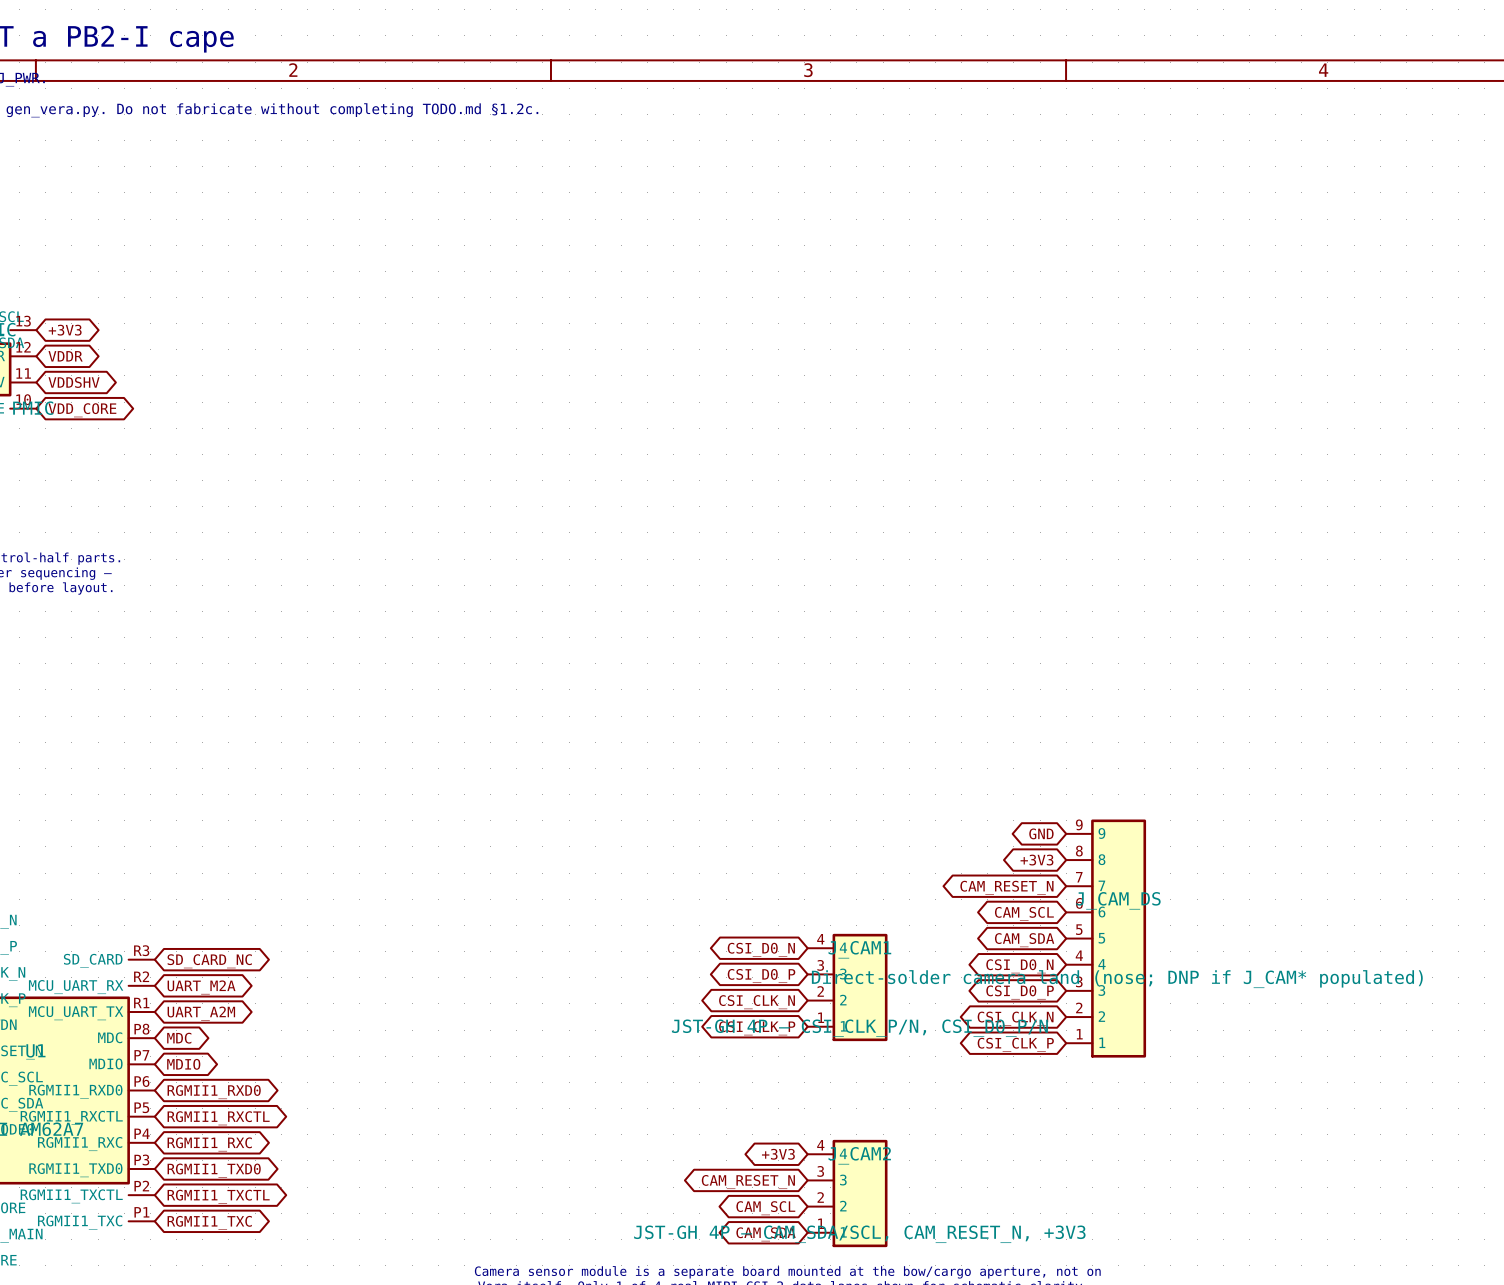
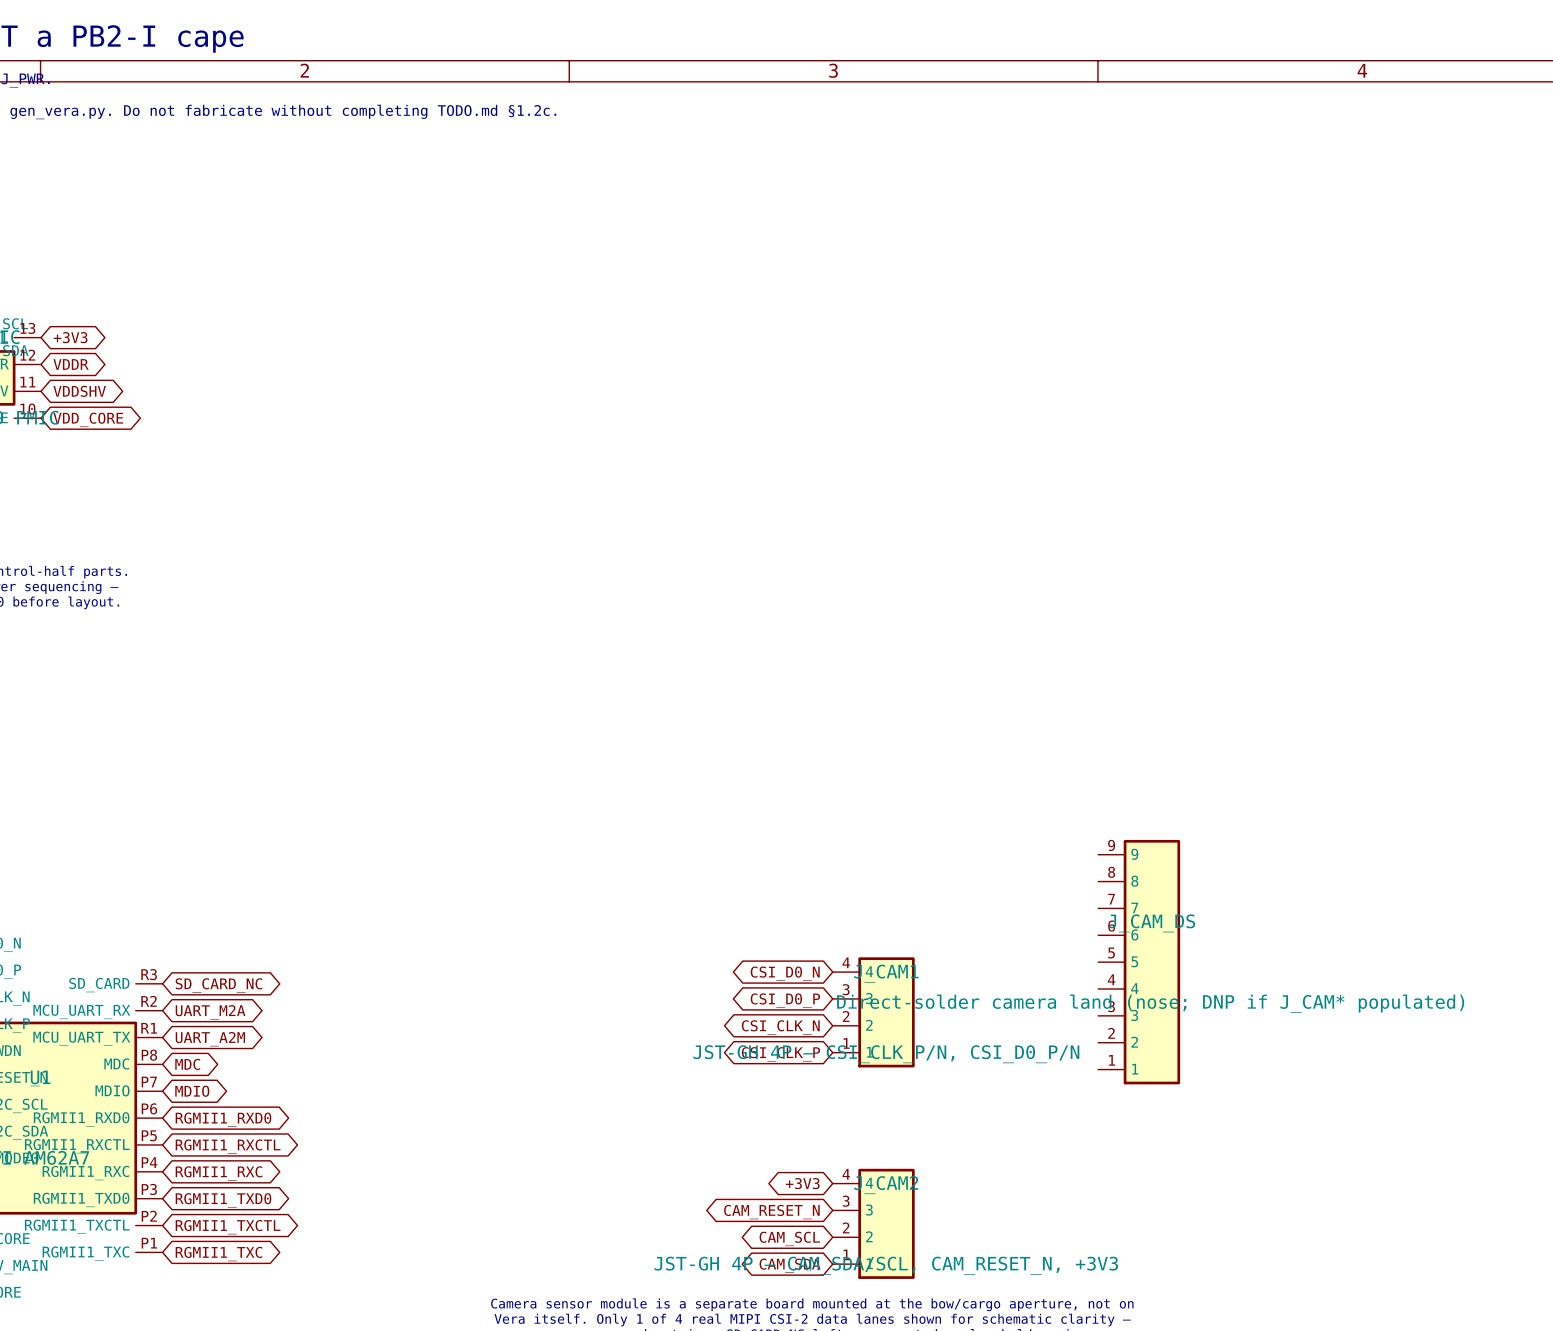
global label: GND (1041, 833) -> none
global label: +3V3 (1036, 860) -> none
global label: CAM_RESET_N (1006, 887) -> none
global label: CAM_SCL (1024, 913) -> none
global label: CAM_SDA (1024, 940) -> none
global label: CSI_D0_N (1019, 966) -> none
global label: CSI_D0_P (1020, 992) -> none
global label: CSI_CLK_N (1015, 1018) -> none
global label: CSI_CLK_P (1015, 1044) -> none

